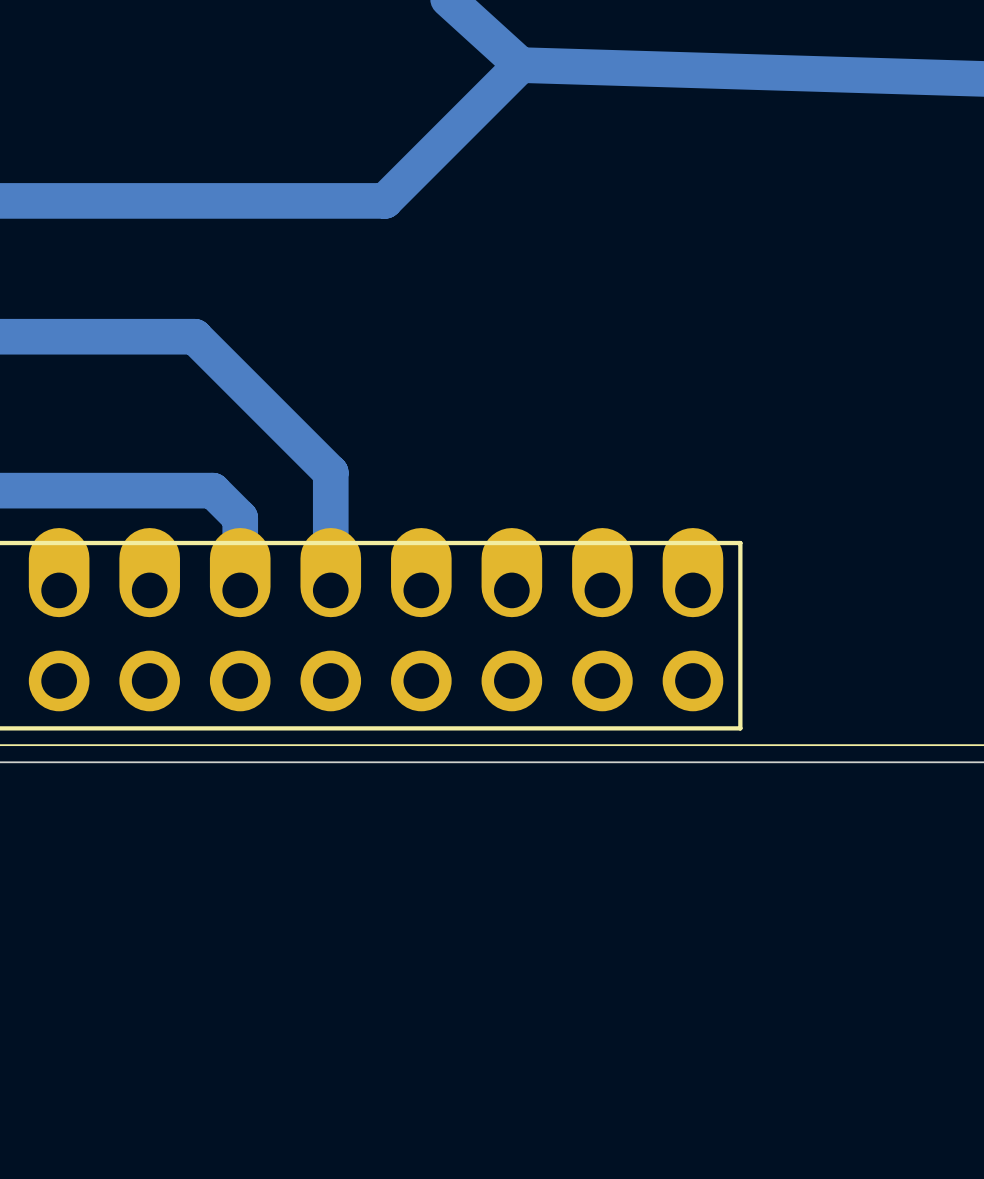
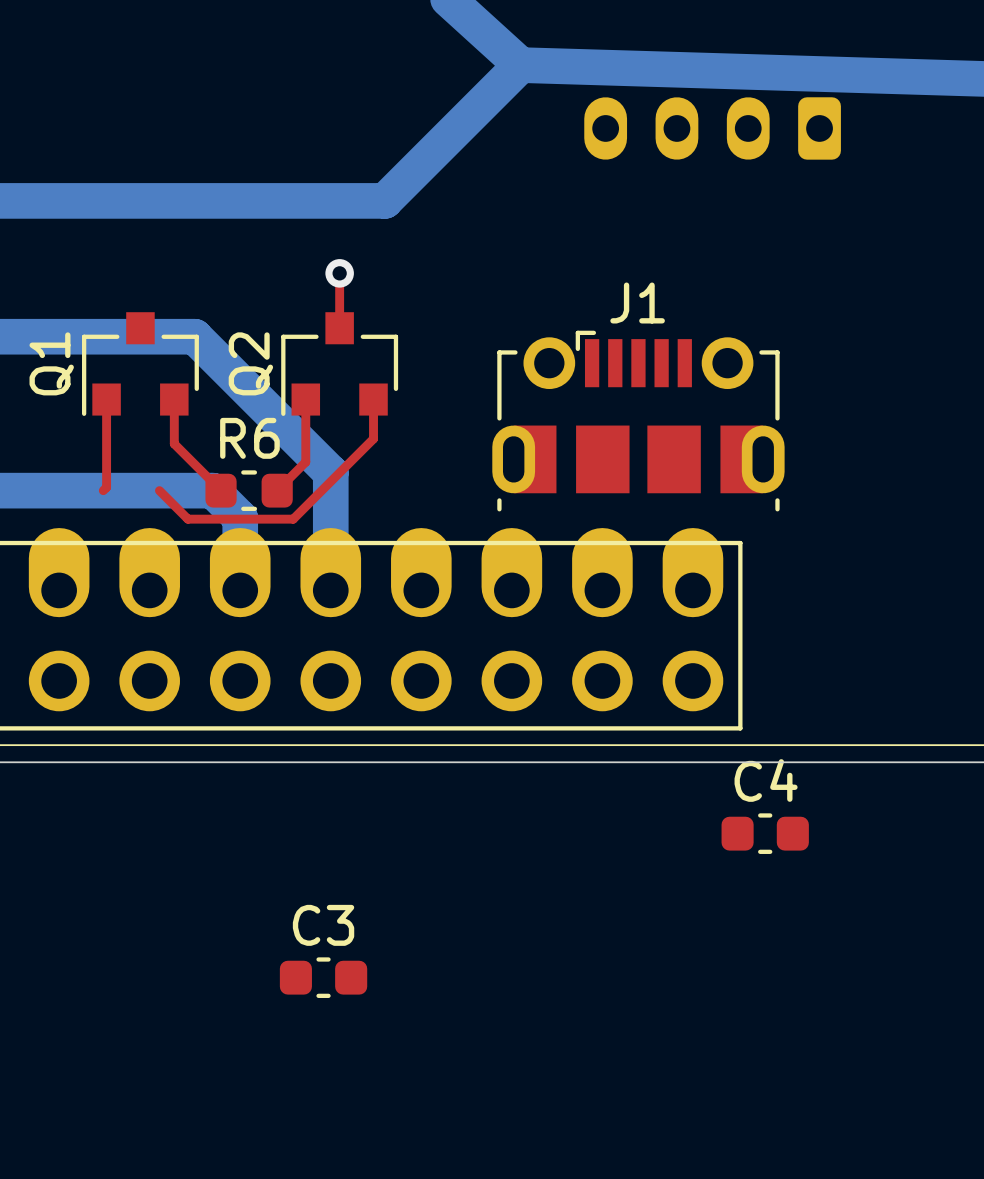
part: none -> (712, 128)
top track: none -> (339, 273) (339, 328)
via: none -> (339, 273)
Q1: none -> (140, 364)
Q2: none -> (339, 364)
top track: none -> (106, 399) (106, 487) (103, 490)
top track: none -> (174, 399) (174, 443) (221, 490)
top track: none -> (305, 399) (305, 462) (277, 490)
top track: none -> (373, 399) (373, 438) (293, 519) (187, 519) (159, 490)
J1: none -> (638, 421)
R6: none -> (249, 490)
C4: none -> (765, 833)
C3: none -> (323, 977)

